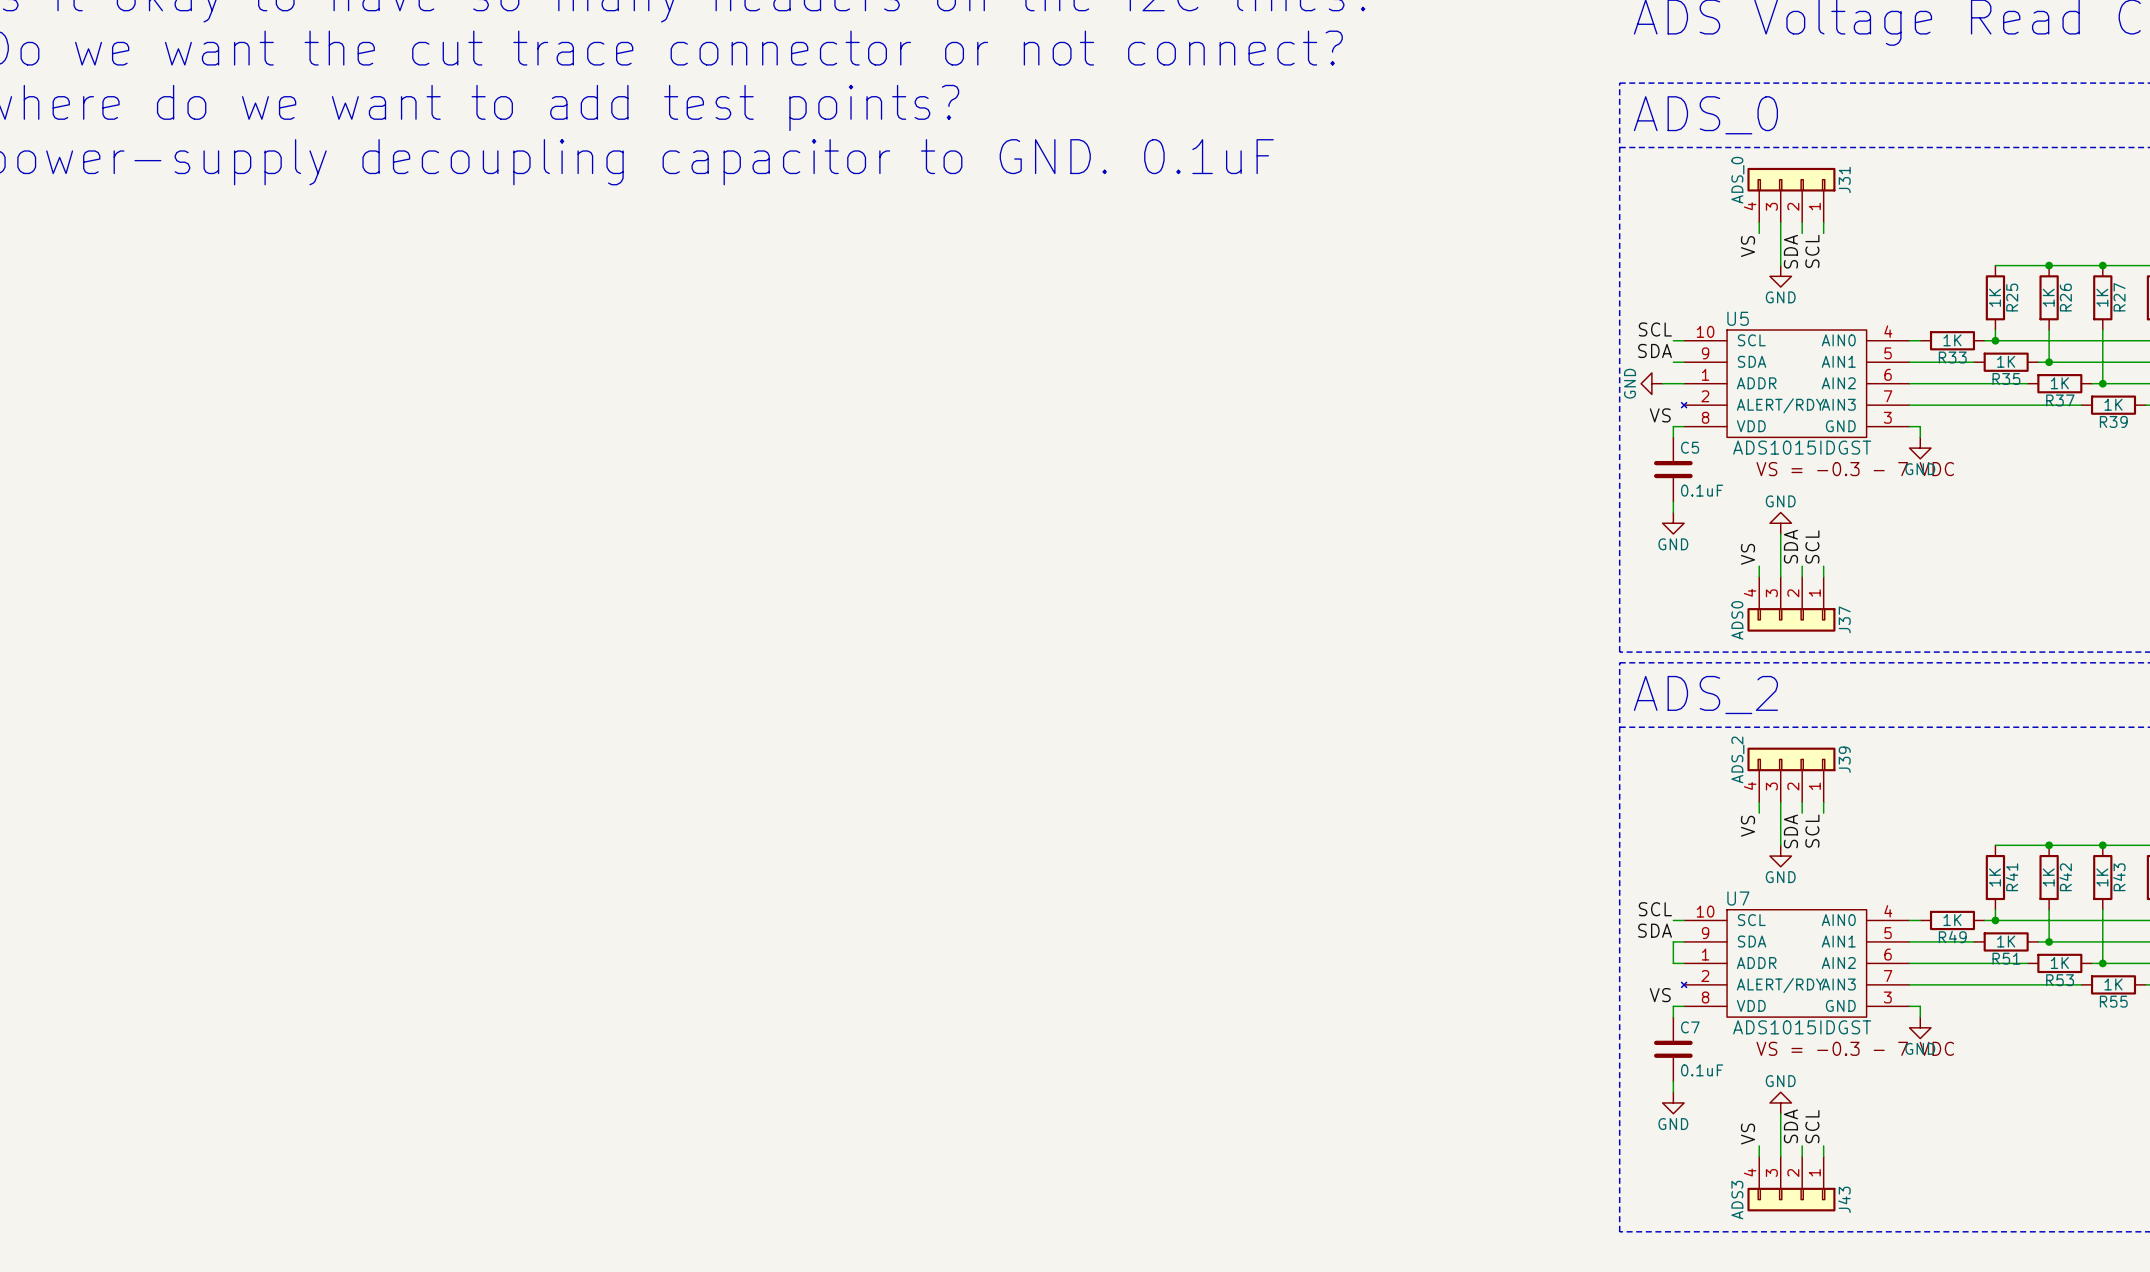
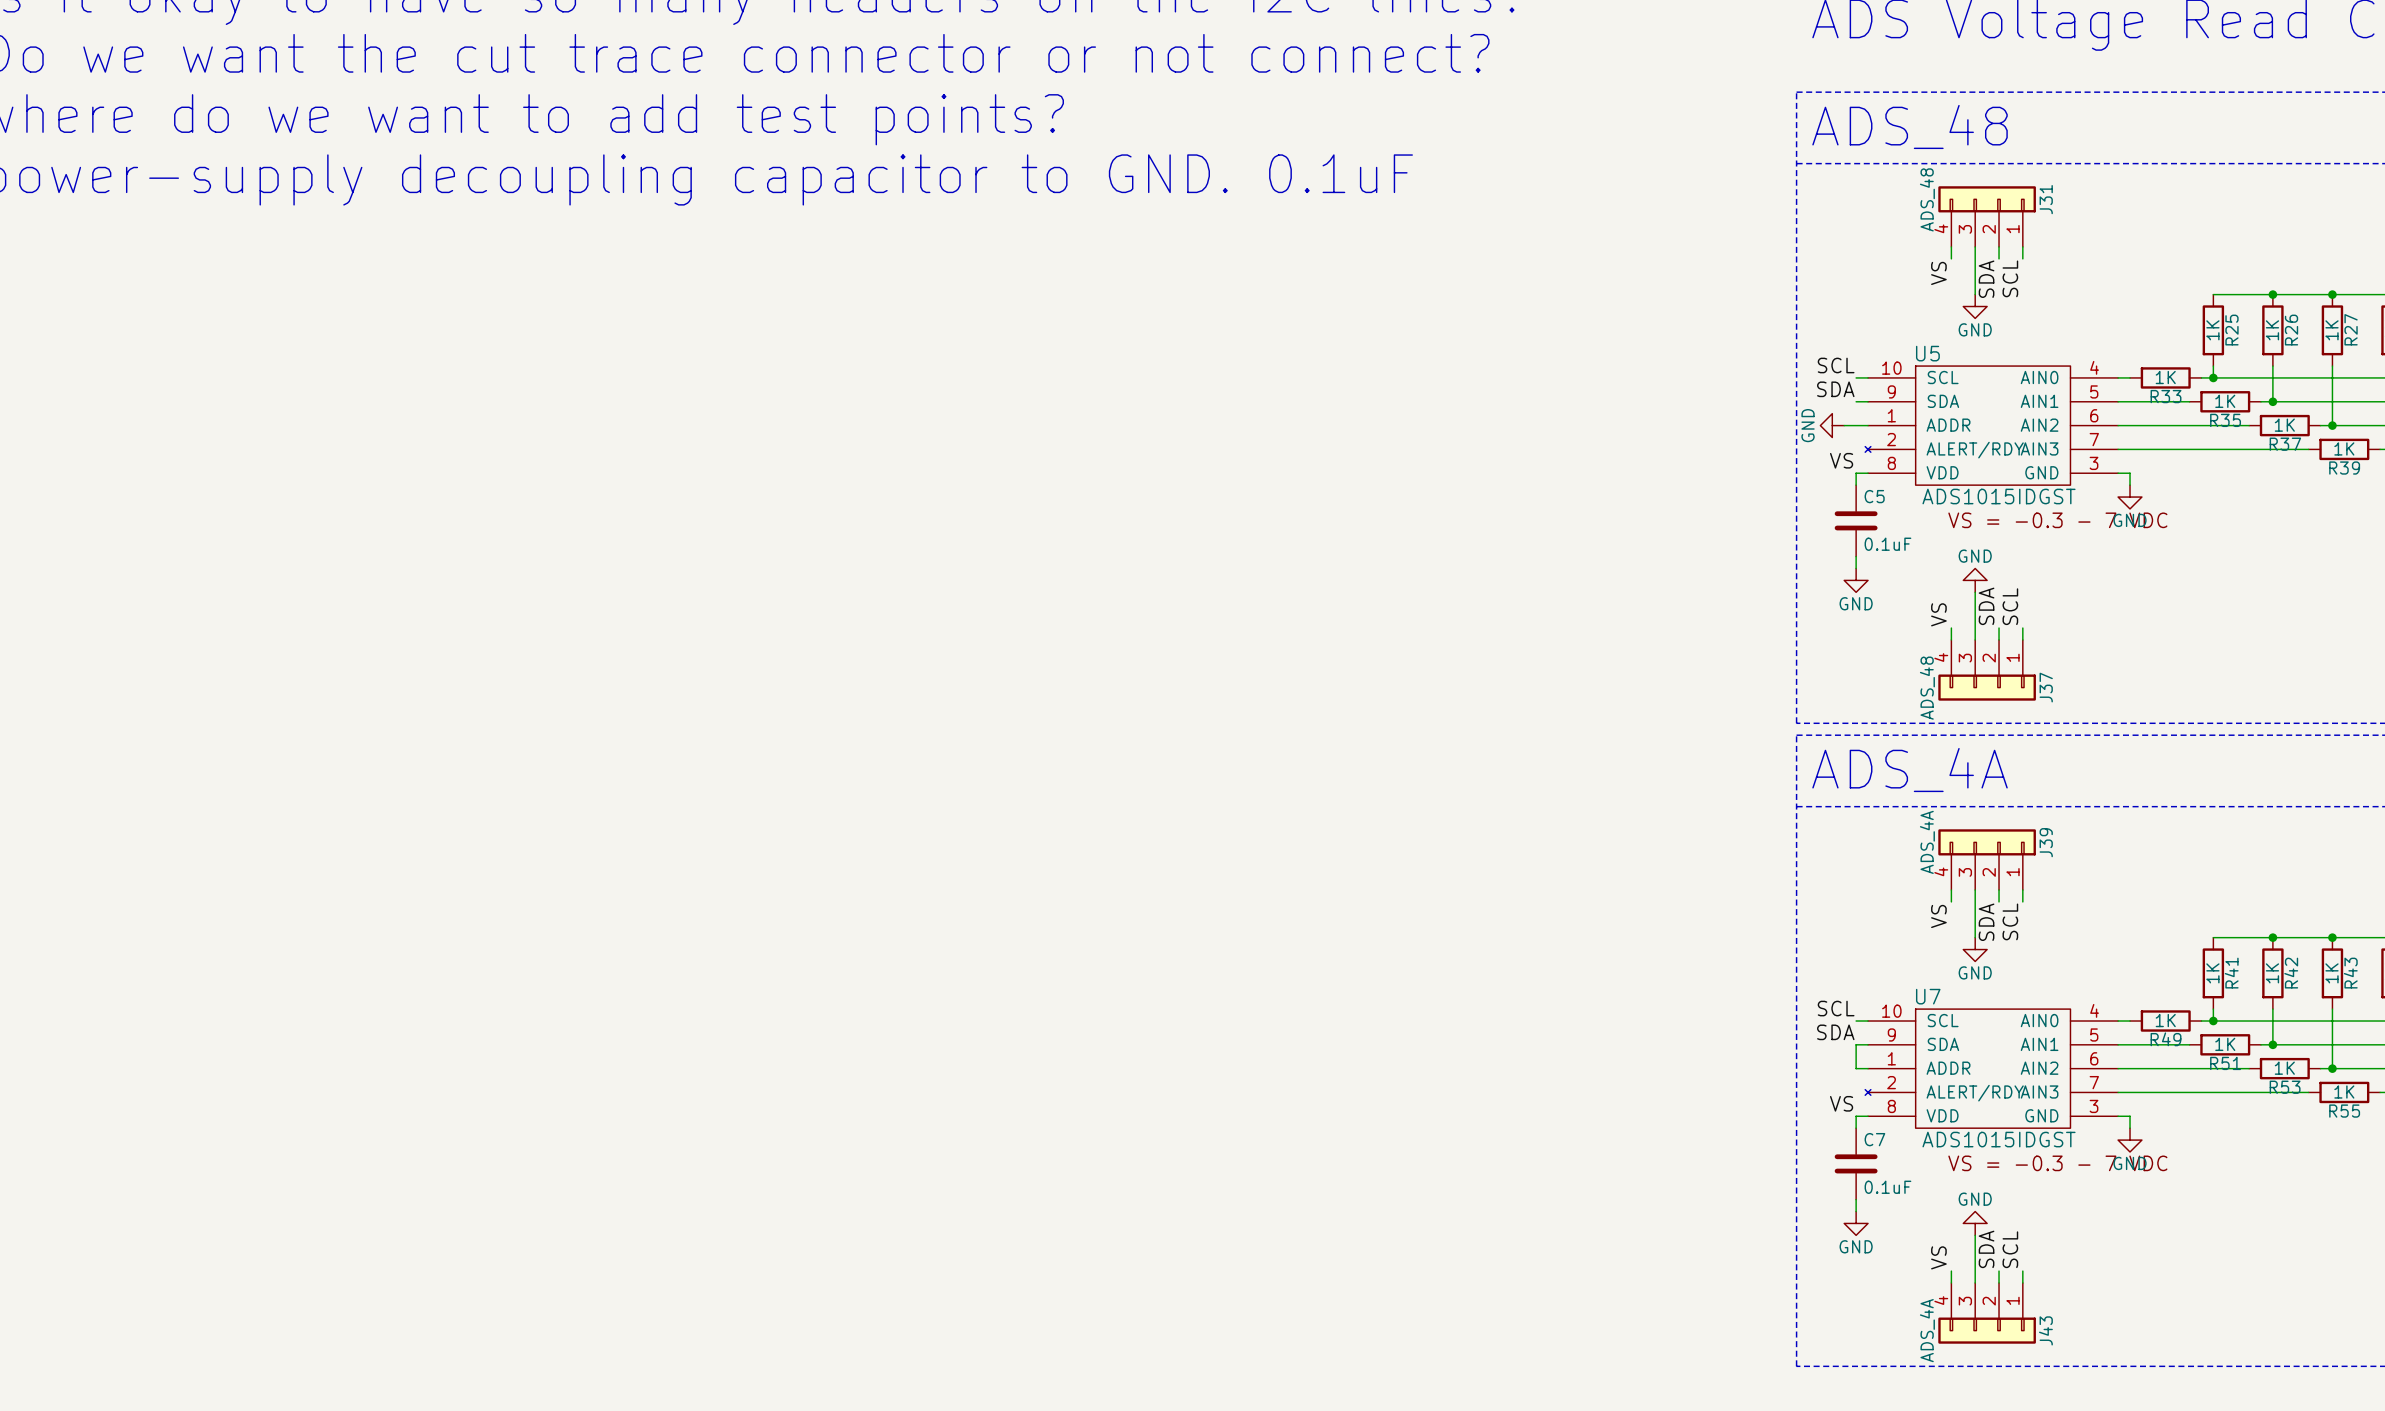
text: ADS_0 (1705, 115) -> ADS_48 (1910, 126)
J31 value: ADS_0 (1737, 180) -> ADS_48 (1927, 199)
J37 value: ADS0 (1737, 620) -> ADS_48 (1927, 688)
text: ADS_2 (1705, 695) -> ADS_4A (1910, 770)
J39 value: ADS_2 (1737, 759) -> ADS_4A (1927, 842)
J43 value: ADS3 (1737, 1200) -> ADS_4A (1927, 1330)

